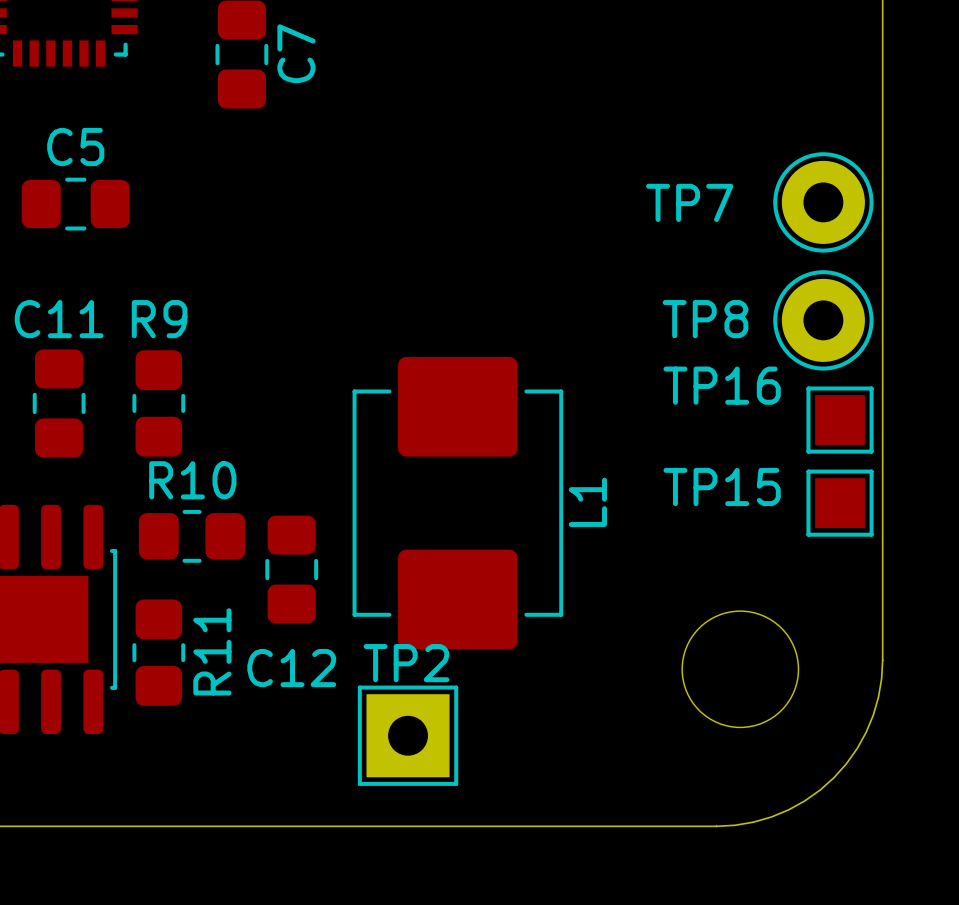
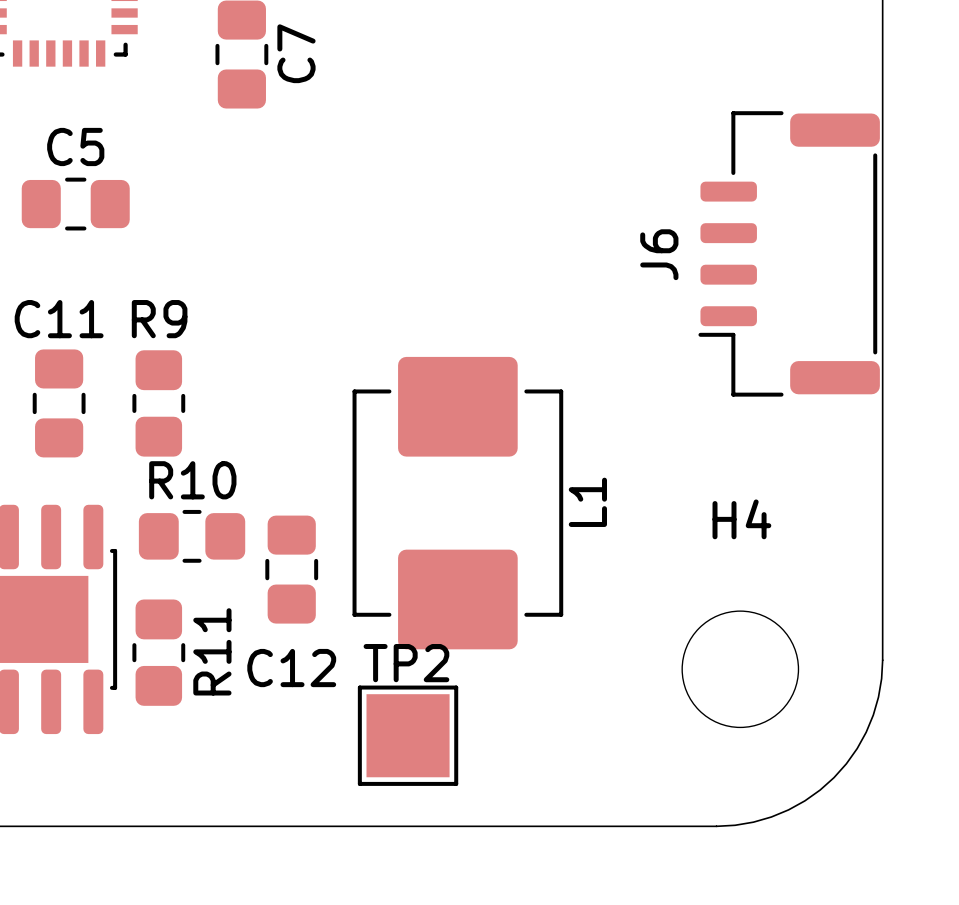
TP7: (823, 202) -> none
J6: none -> (789, 253)
TP8: (823, 320) -> none
TP16: (840, 420) -> none
TP15: (840, 503) -> none
H4 name: none -> H4 (741, 519)
TP2 footprint: [357, 685, 459, 786] -> [357, 685, 459, 786]

